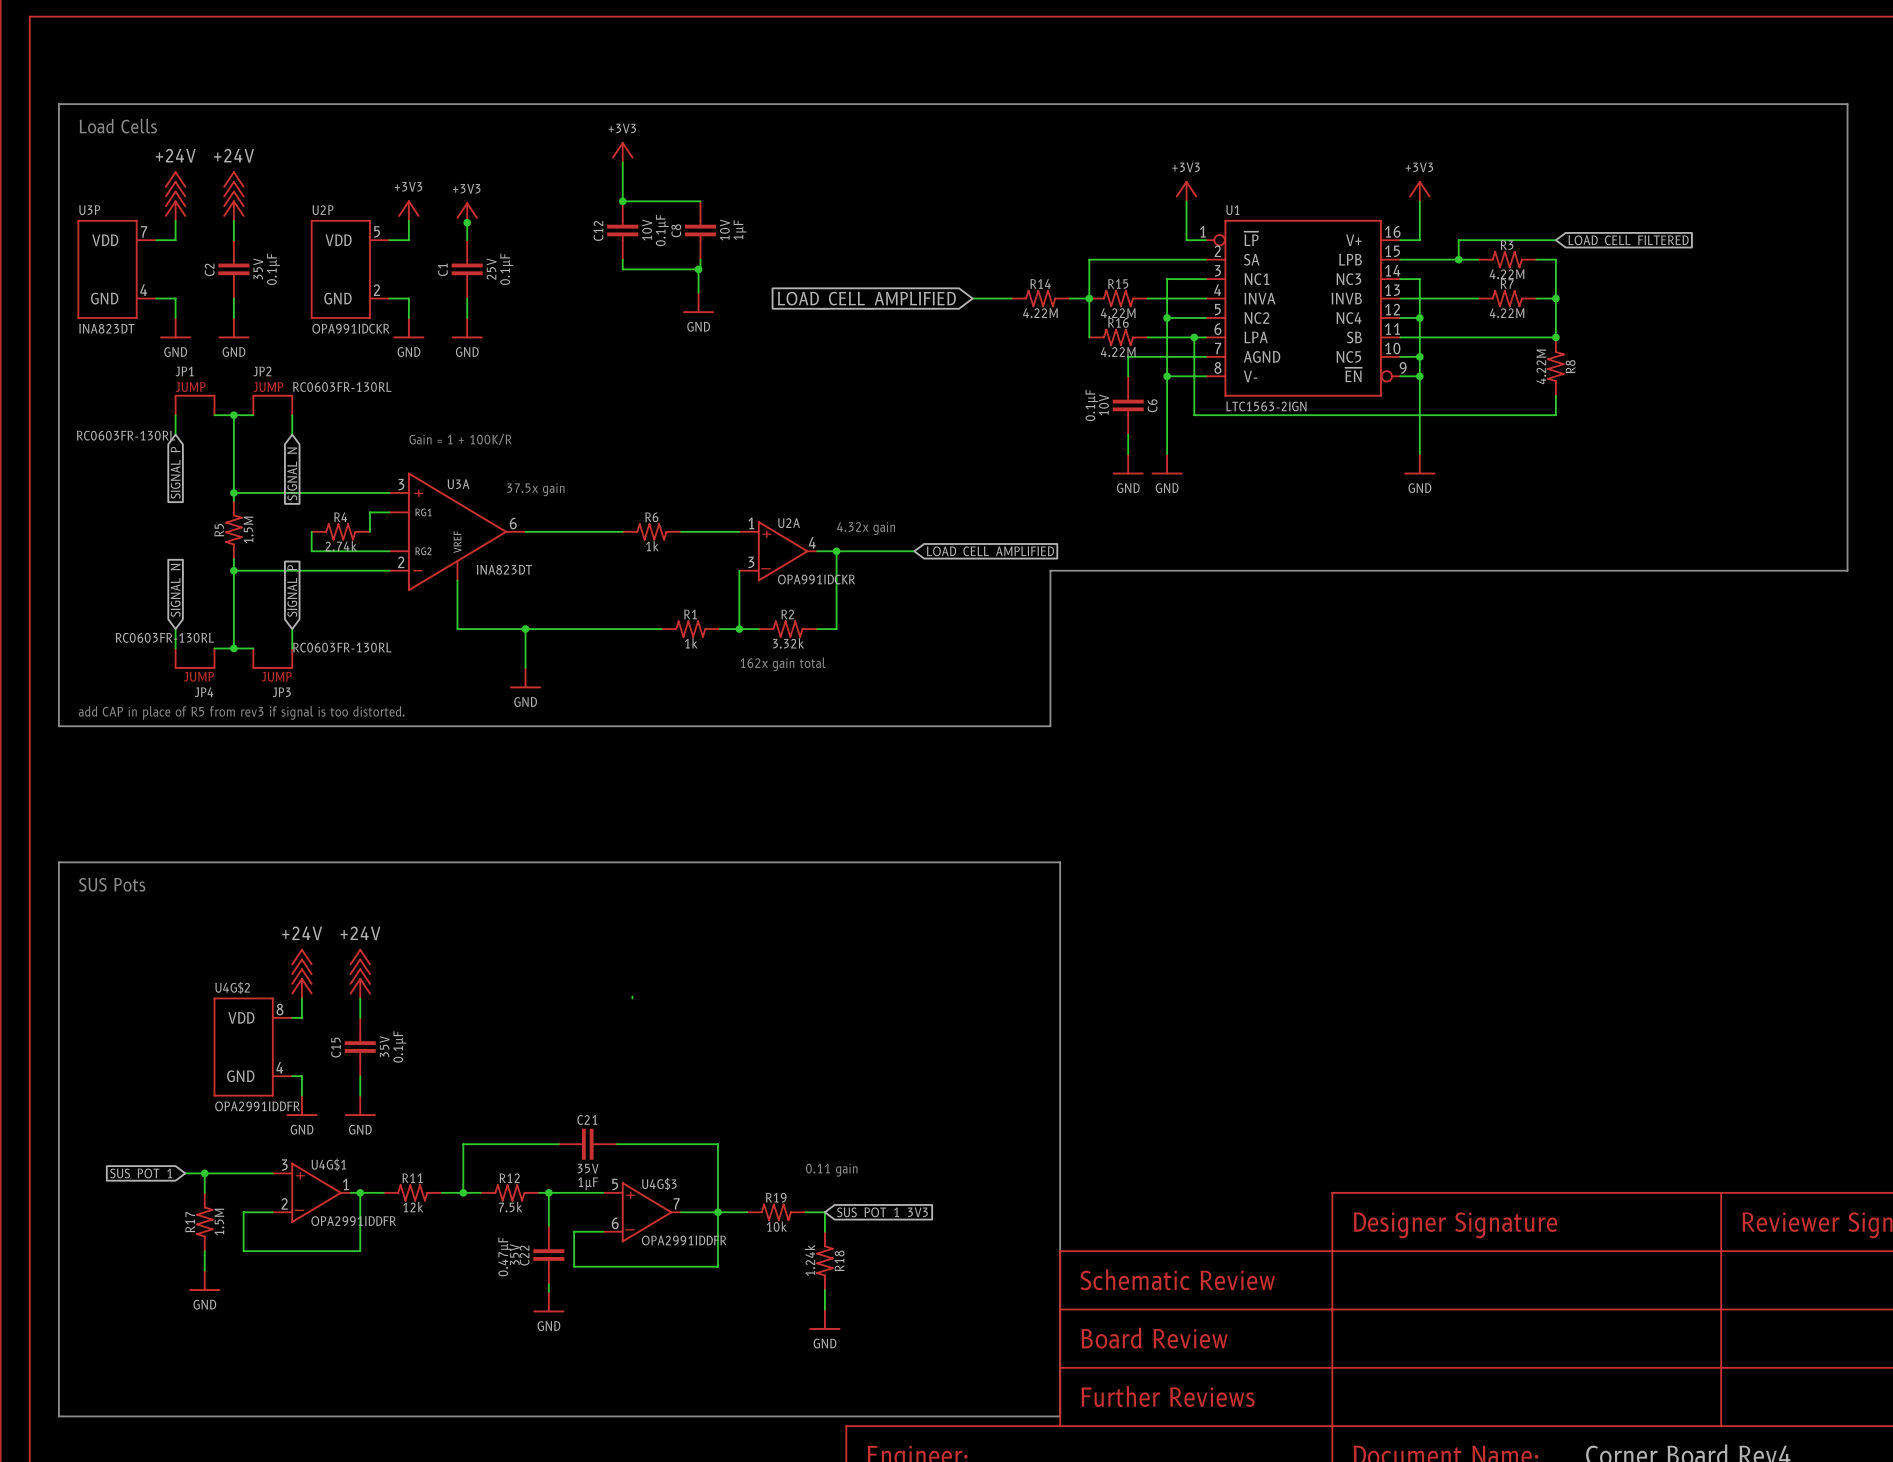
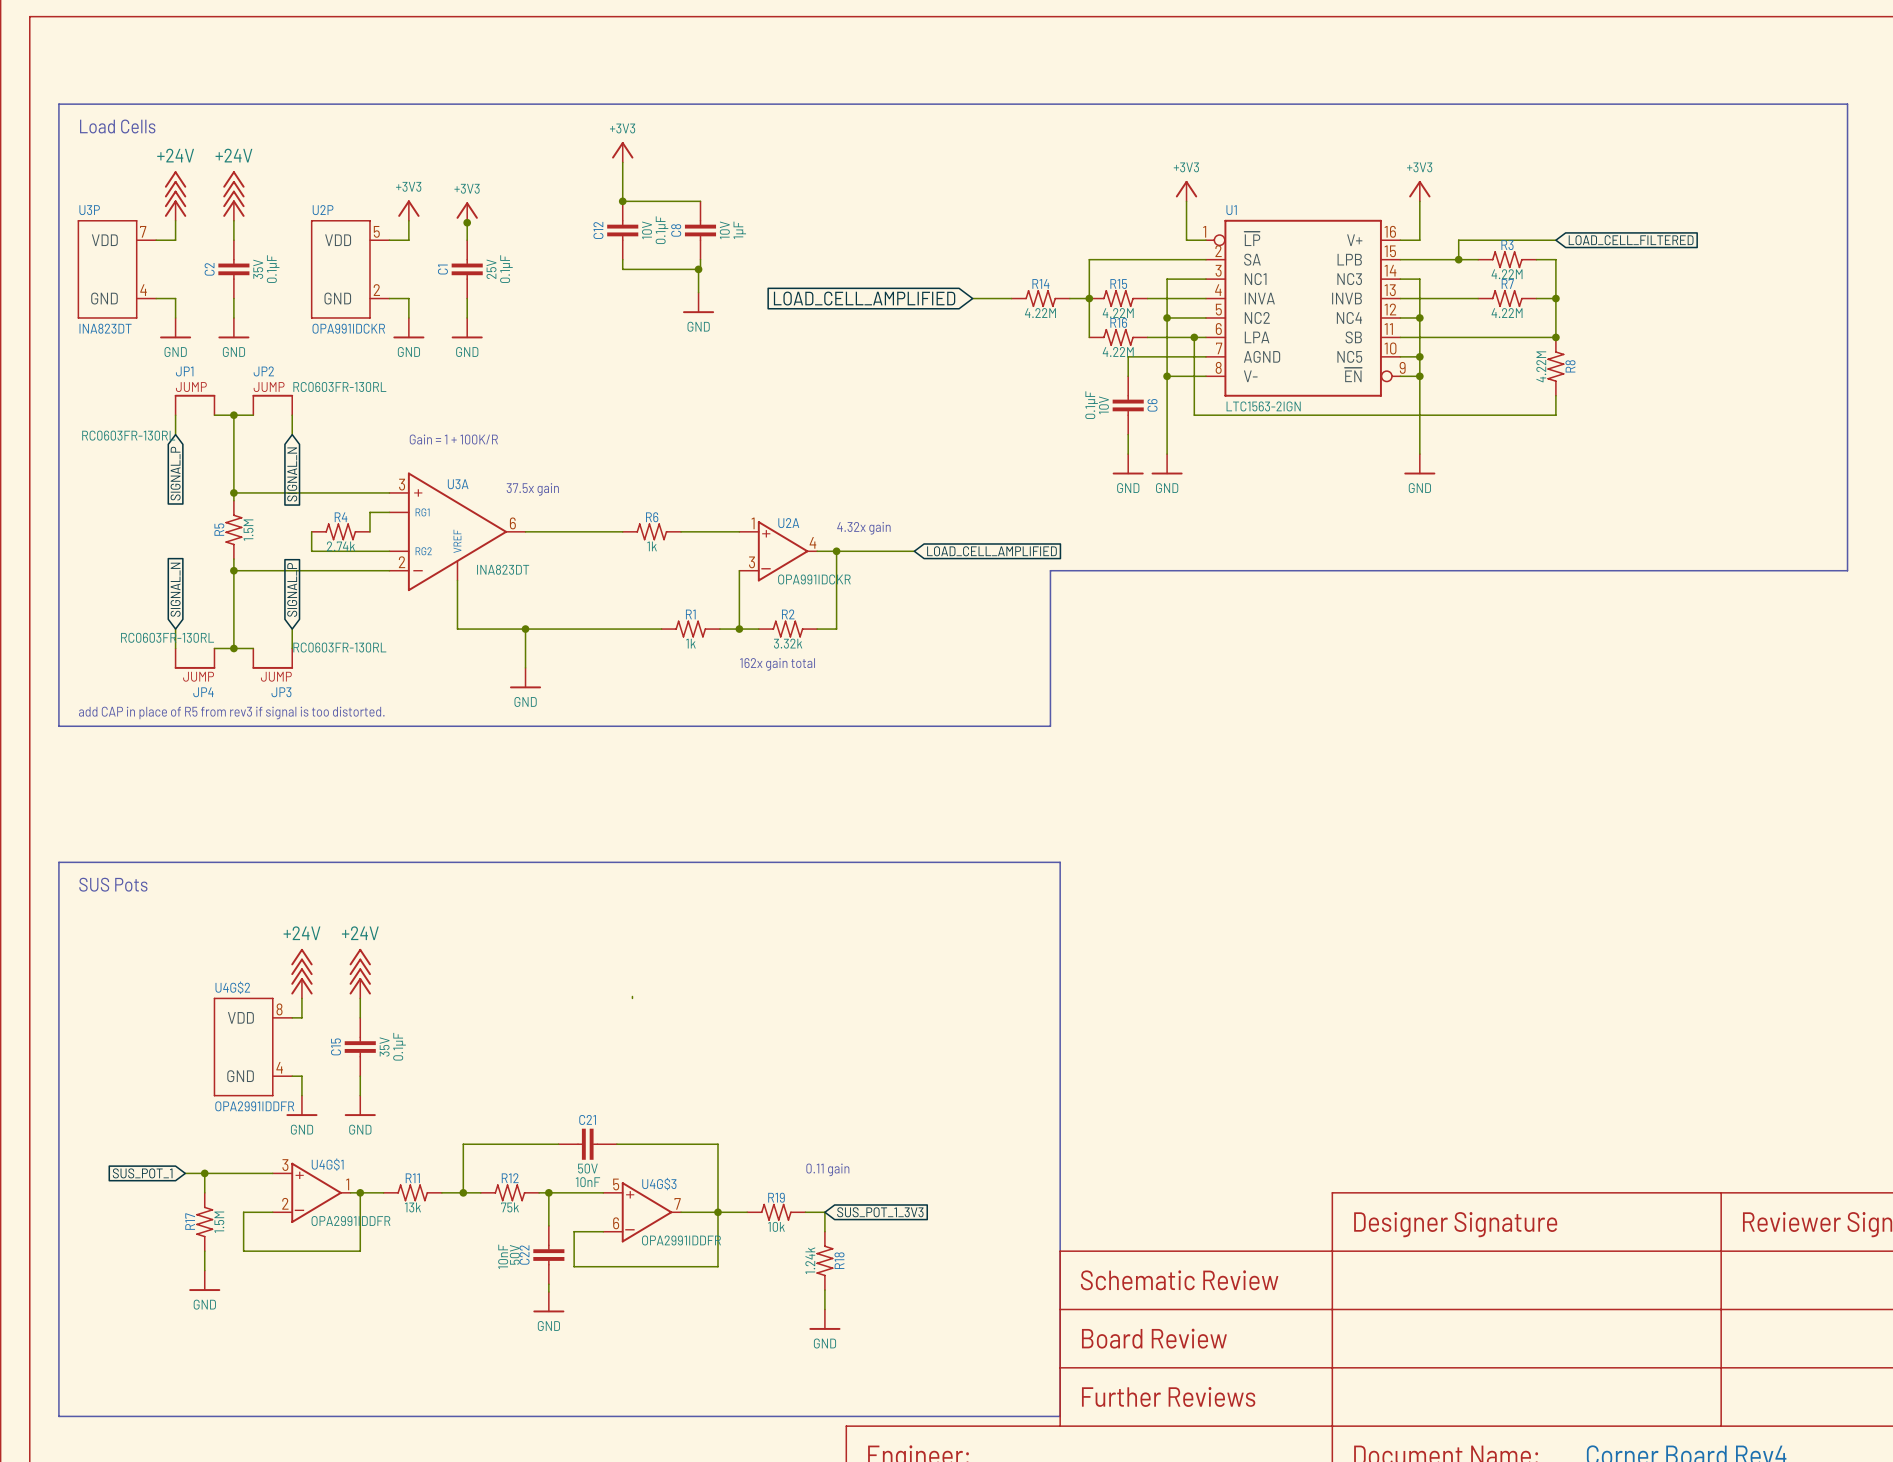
C21 text: 35V (588, 1168) -> 50V (587, 1168)
C21 text: 1µF (588, 1183) -> 10nF (587, 1182)
R11 text: 12k (413, 1207) -> 13k (412, 1207)
R12 text: 7.5k (510, 1207) -> 75k (510, 1207)
C22 text: 35V (514, 1254) -> 50V (514, 1254)
C22 text: 0.47µF (504, 1256) -> 10nF (503, 1256)

